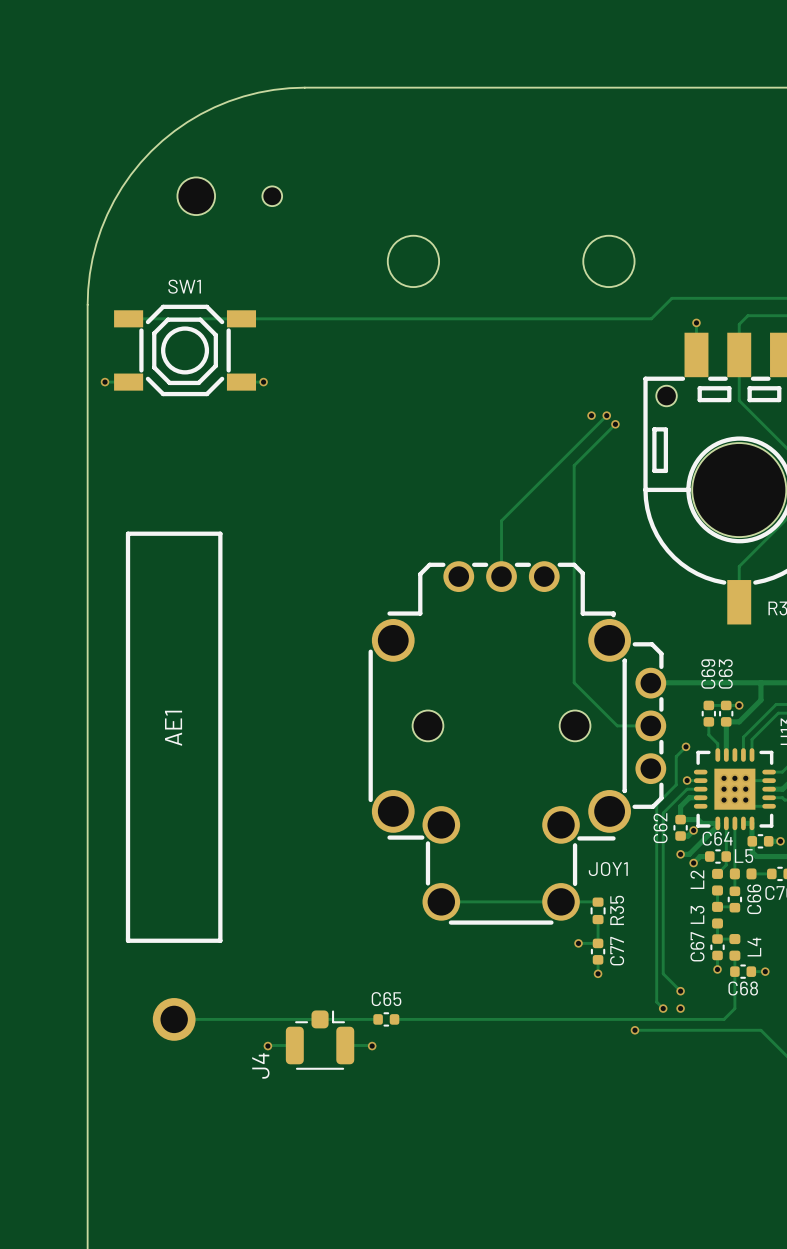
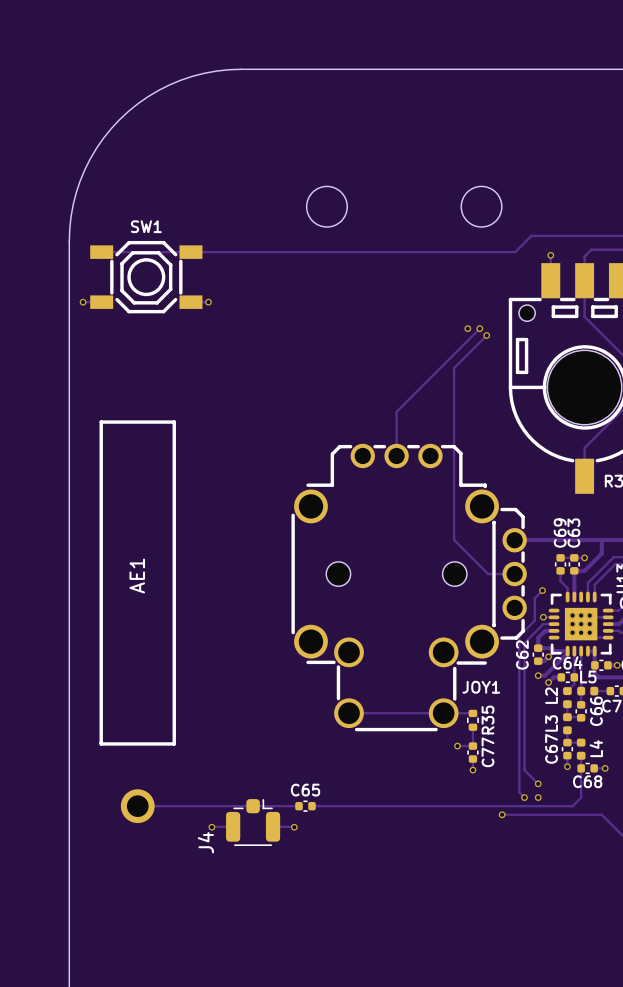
part: (196, 196) -> none
part: (272, 196) -> none

